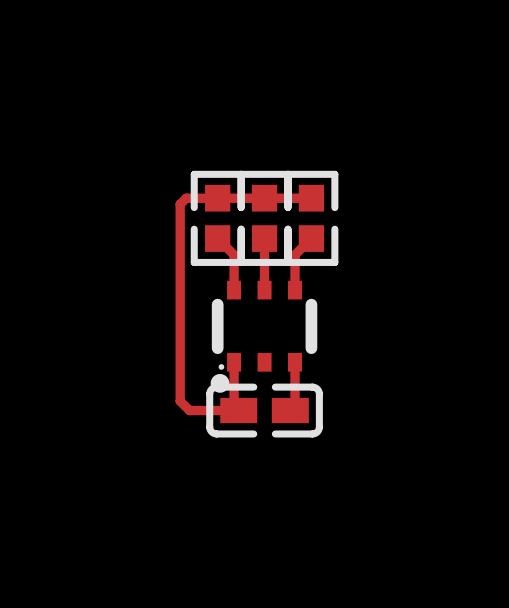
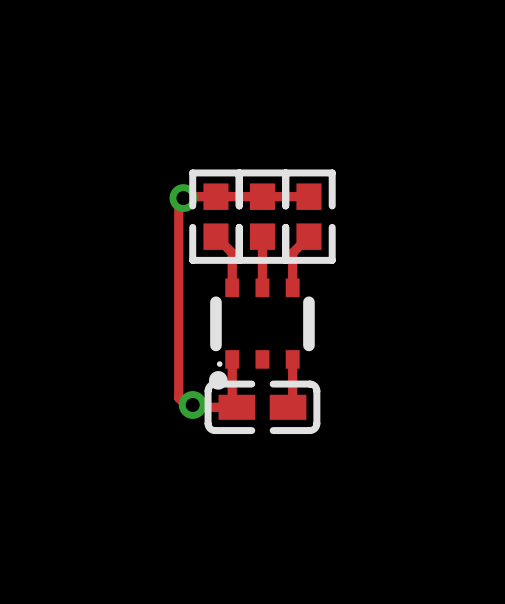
via: none -> (183, 198)
via: none -> (192, 404)

